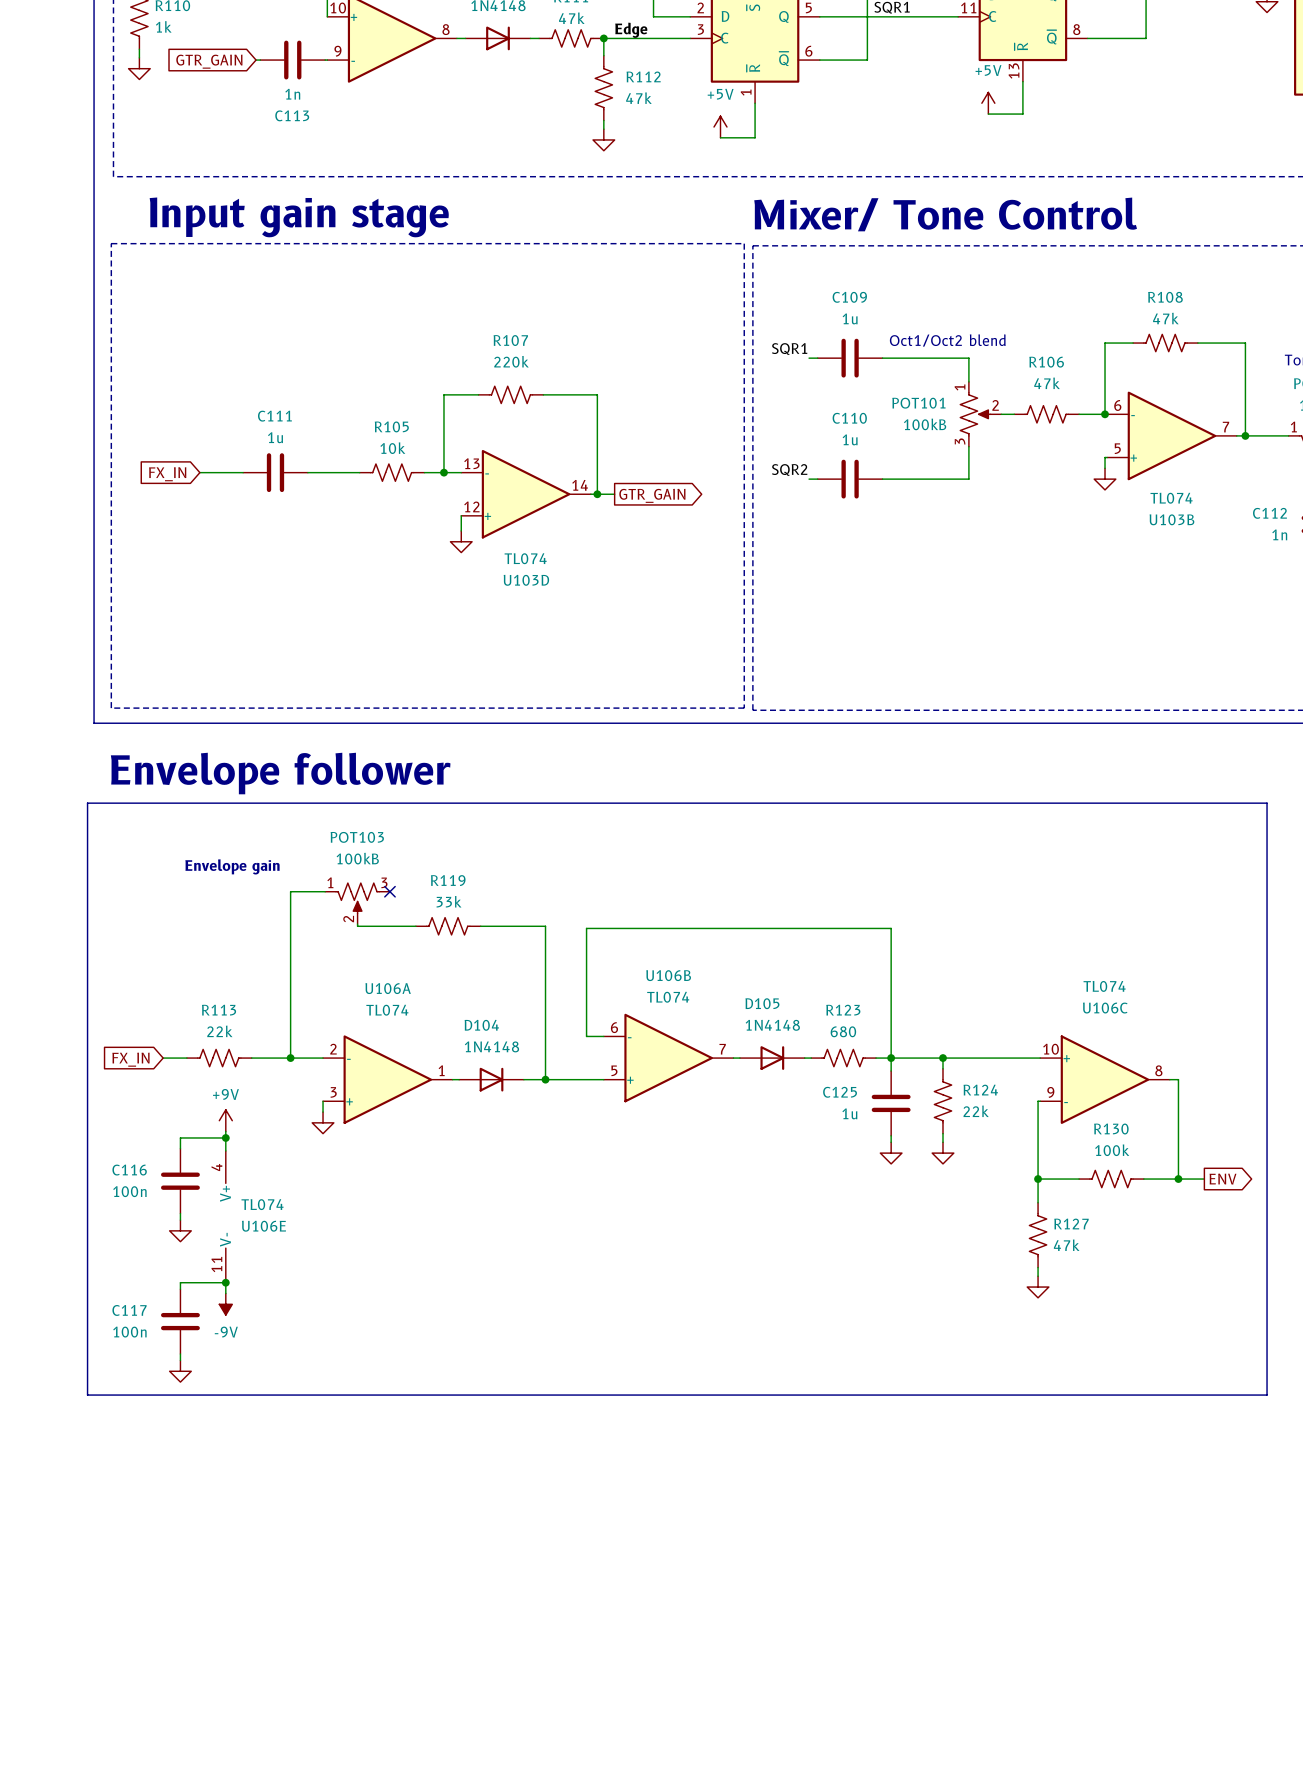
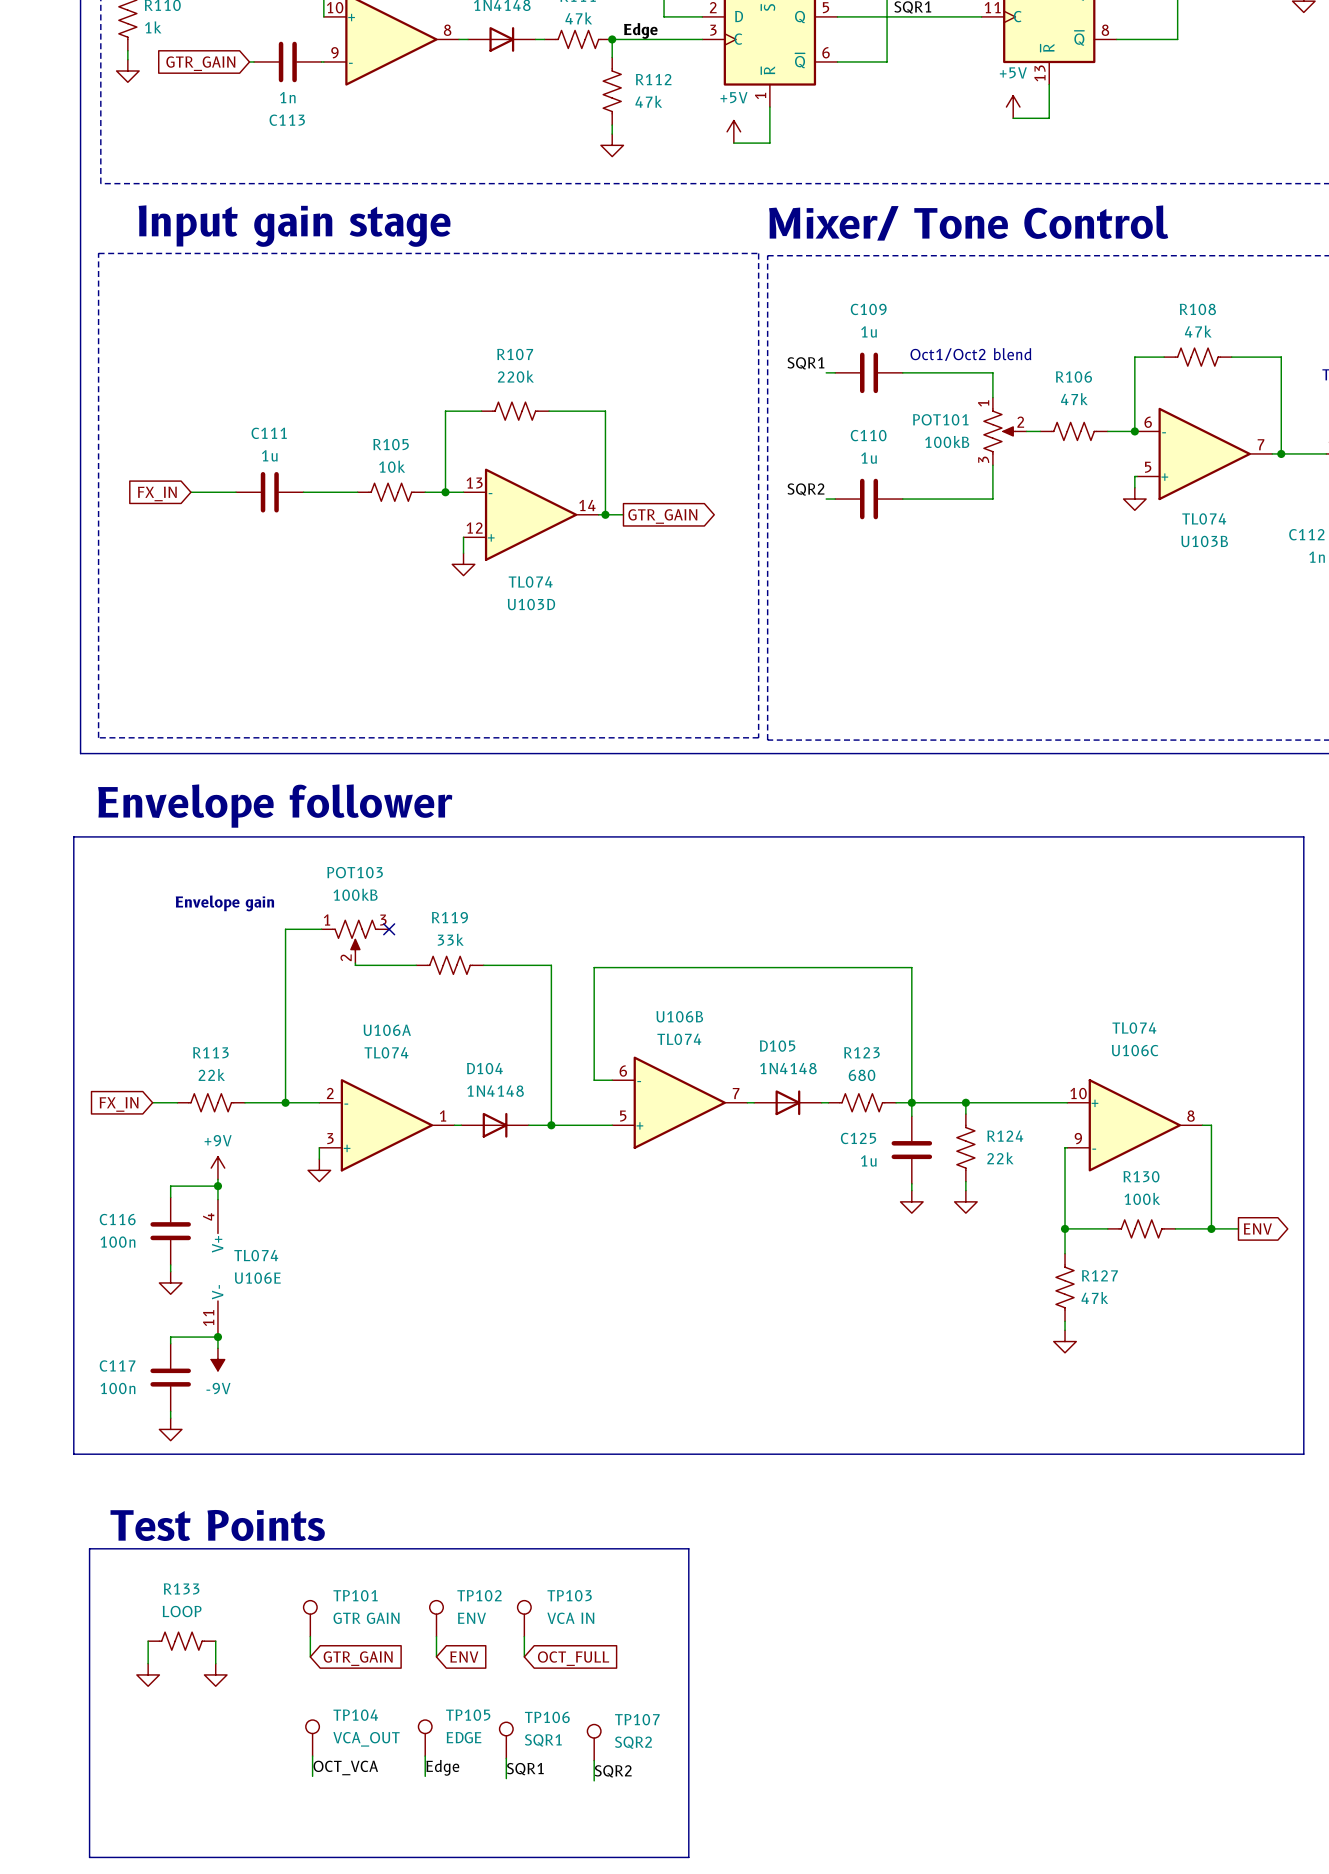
text: none -> Test Points (217, 1525)
line: none -> (89, 1548) (688, 1548) (688, 1857) (89, 1857) (89, 1548)
TP101: none -> GTR GAIN (310, 1618)
TP102: none -> ENV (436, 1618)
TP103: none -> VCA IN (524, 1618)
wire: none -> (310, 1636) (310, 1656)
wire: none -> (436, 1636) (436, 1656)
wire: none -> (524, 1636) (524, 1656)
wire: none -> (148, 1641) (148, 1663)
R133: none -> LOOP (181, 1641)
wire: none -> (215, 1641) (215, 1663)
global label: none -> ENV (464, 1657)
global label: none -> GTR_GAIN (358, 1658)
global label: none -> OCT_FULL (573, 1658)
power symbol: none -> (148, 1674)
power symbol: none -> (215, 1674)
TP104: none -> VCA_OUT (312, 1738)
TP105: none -> EDGE (425, 1738)
TP106: none -> SQR1 (506, 1740)
TP107: none -> SQR2 (594, 1742)
wire: none -> (312, 1756) (312, 1776)
wire: none -> (425, 1756) (425, 1776)
wire: none -> (506, 1758) (506, 1778)
wire: none -> (594, 1760) (594, 1780)
label: none -> OCT_VCA (345, 1767)
label: none -> Edge (442, 1767)
label: none -> SQR1 (525, 1769)
label: none -> SQR2 (613, 1771)

